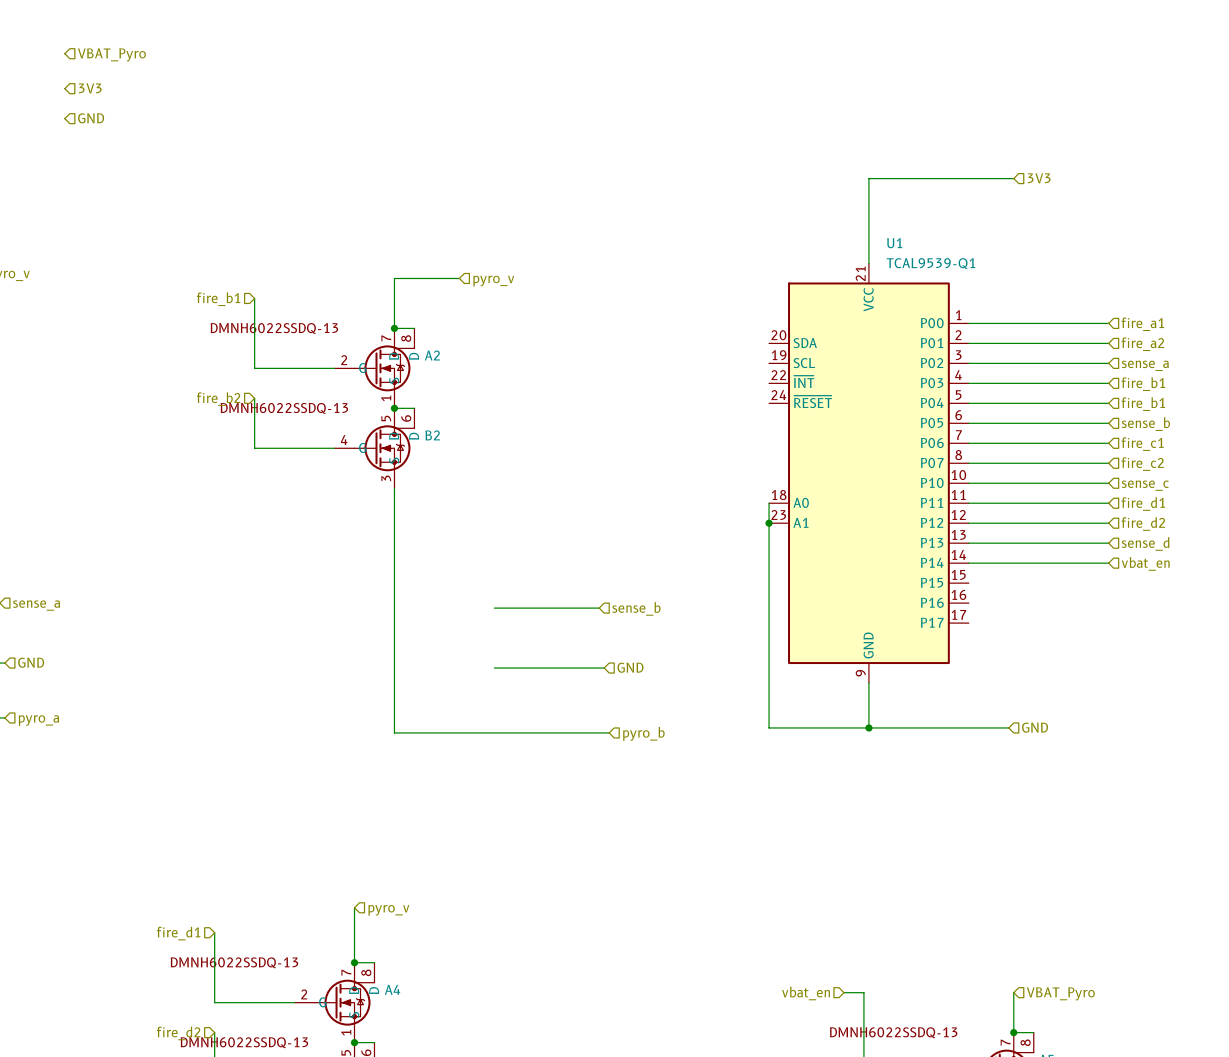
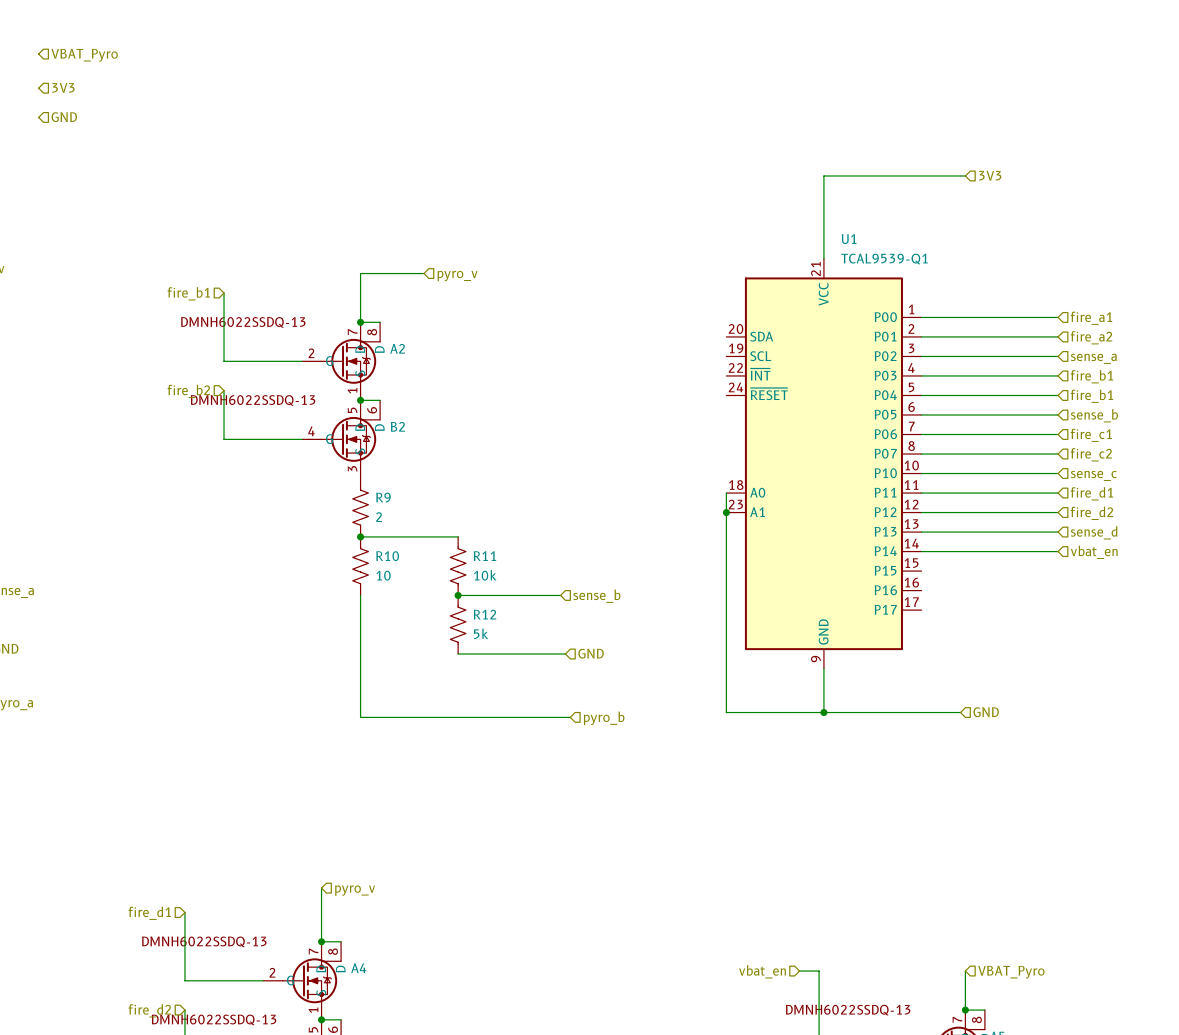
R9: none -> 2 (360, 507)
wire: none -> (360, 536) (458, 536)
junction: none -> (360, 536)
R10: none -> 10 (360, 566)
R11: none -> 10k (458, 566)
junction: none -> (458, 595)
R12: none -> 5k (458, 624)

